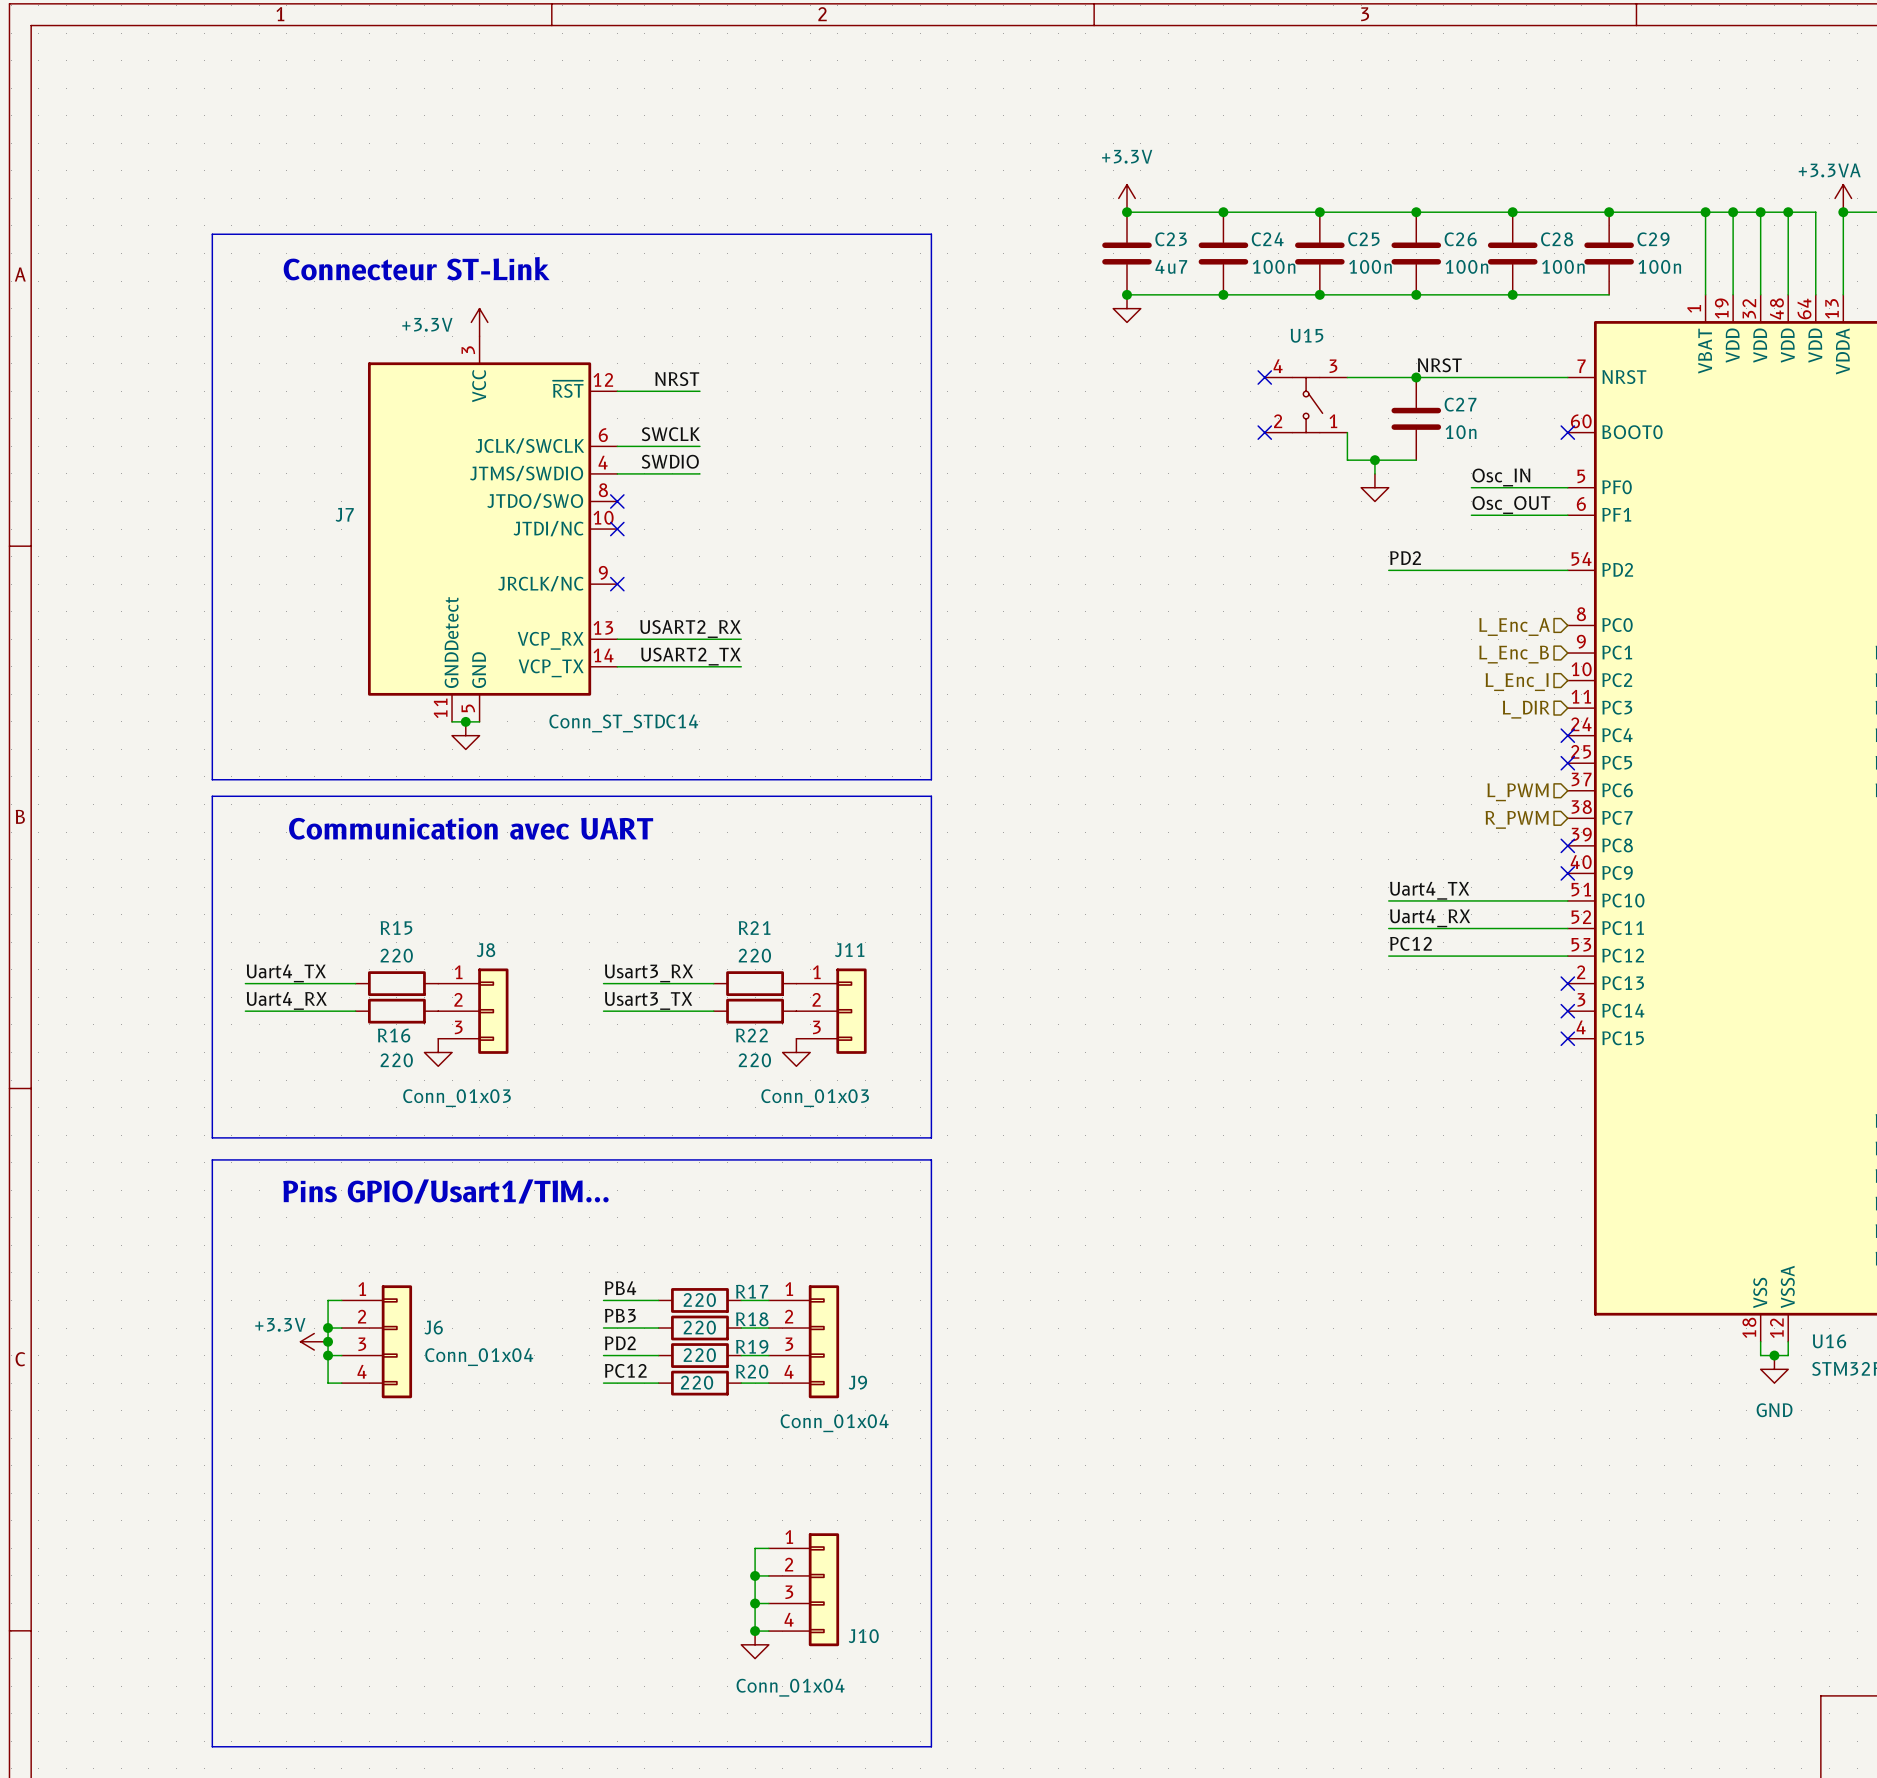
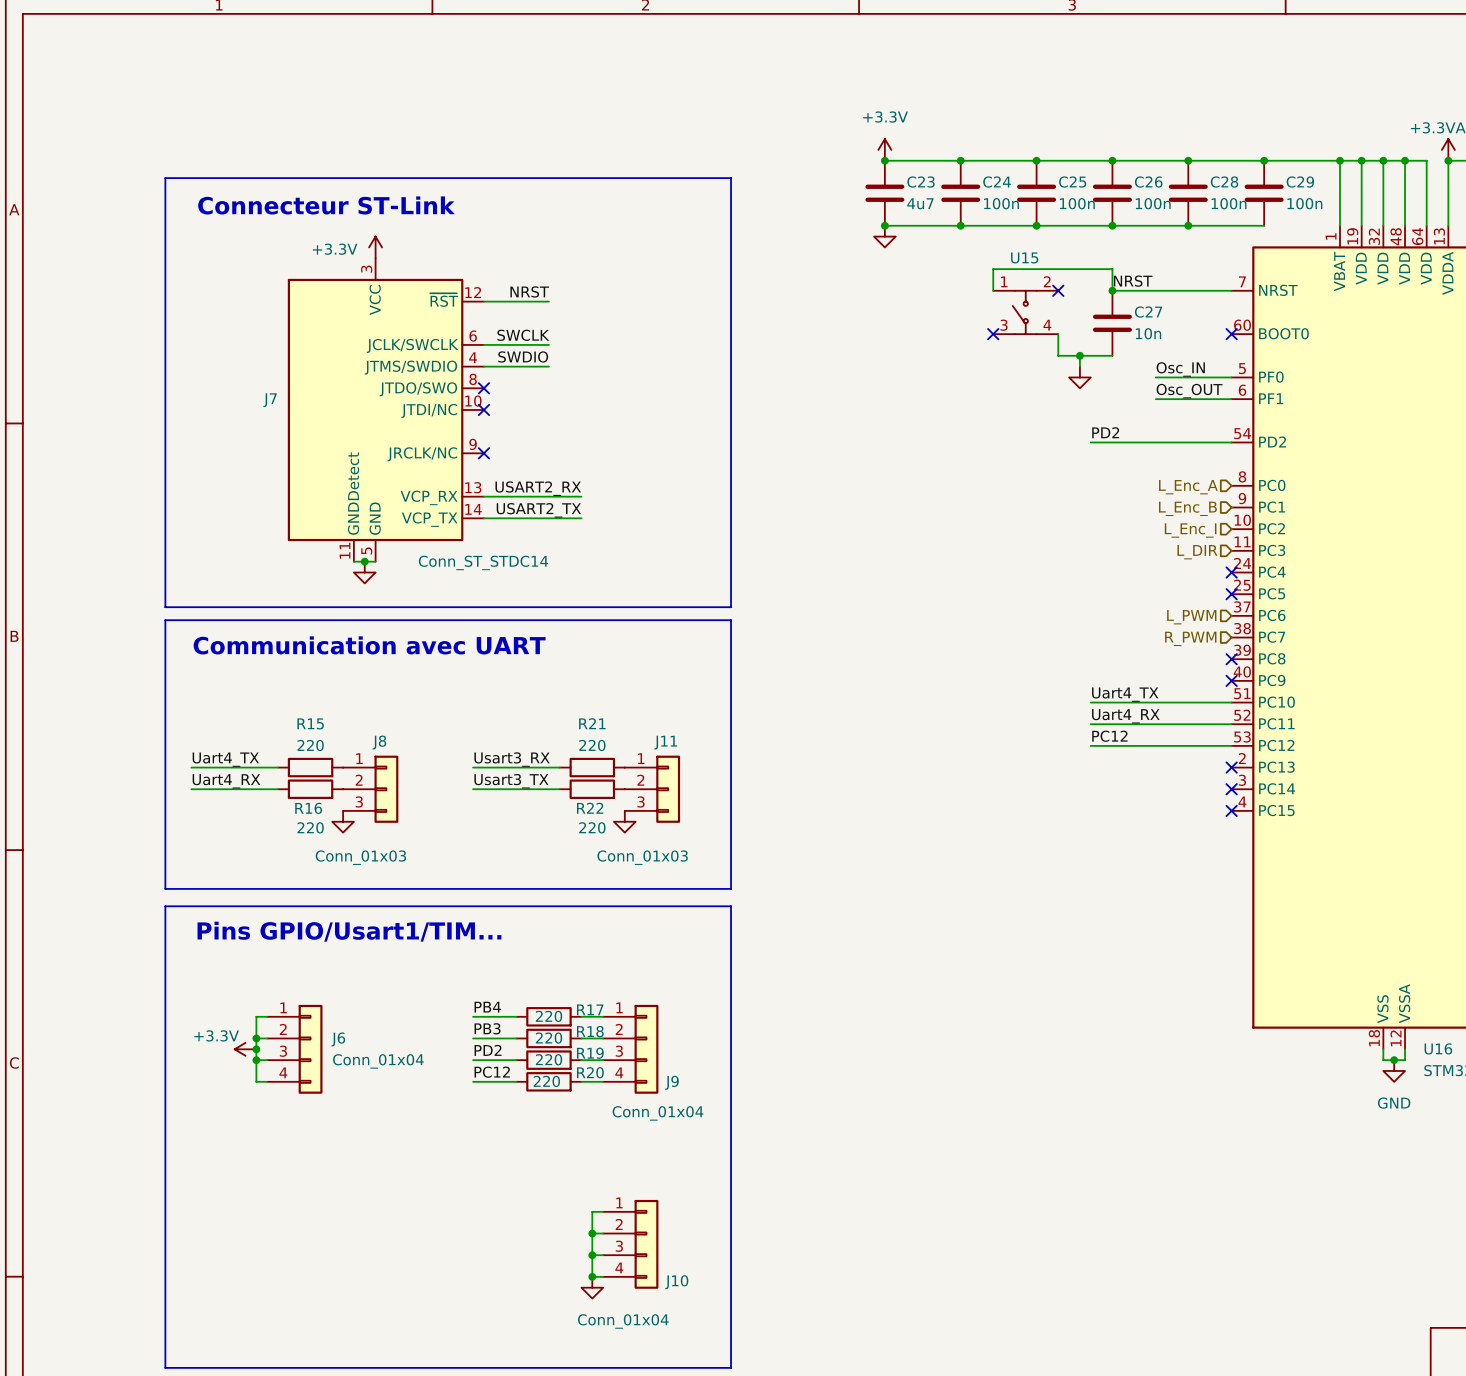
no-connect mark: (1264, 377) -> none
wire: (1347, 377) (1416, 377) -> (993, 290) (993, 269) (1112, 269) (1112, 290)
no-connect mark: none -> (1058, 290)
U15 rotation: 0° (1307, 405) -> 180° (1024, 312)

